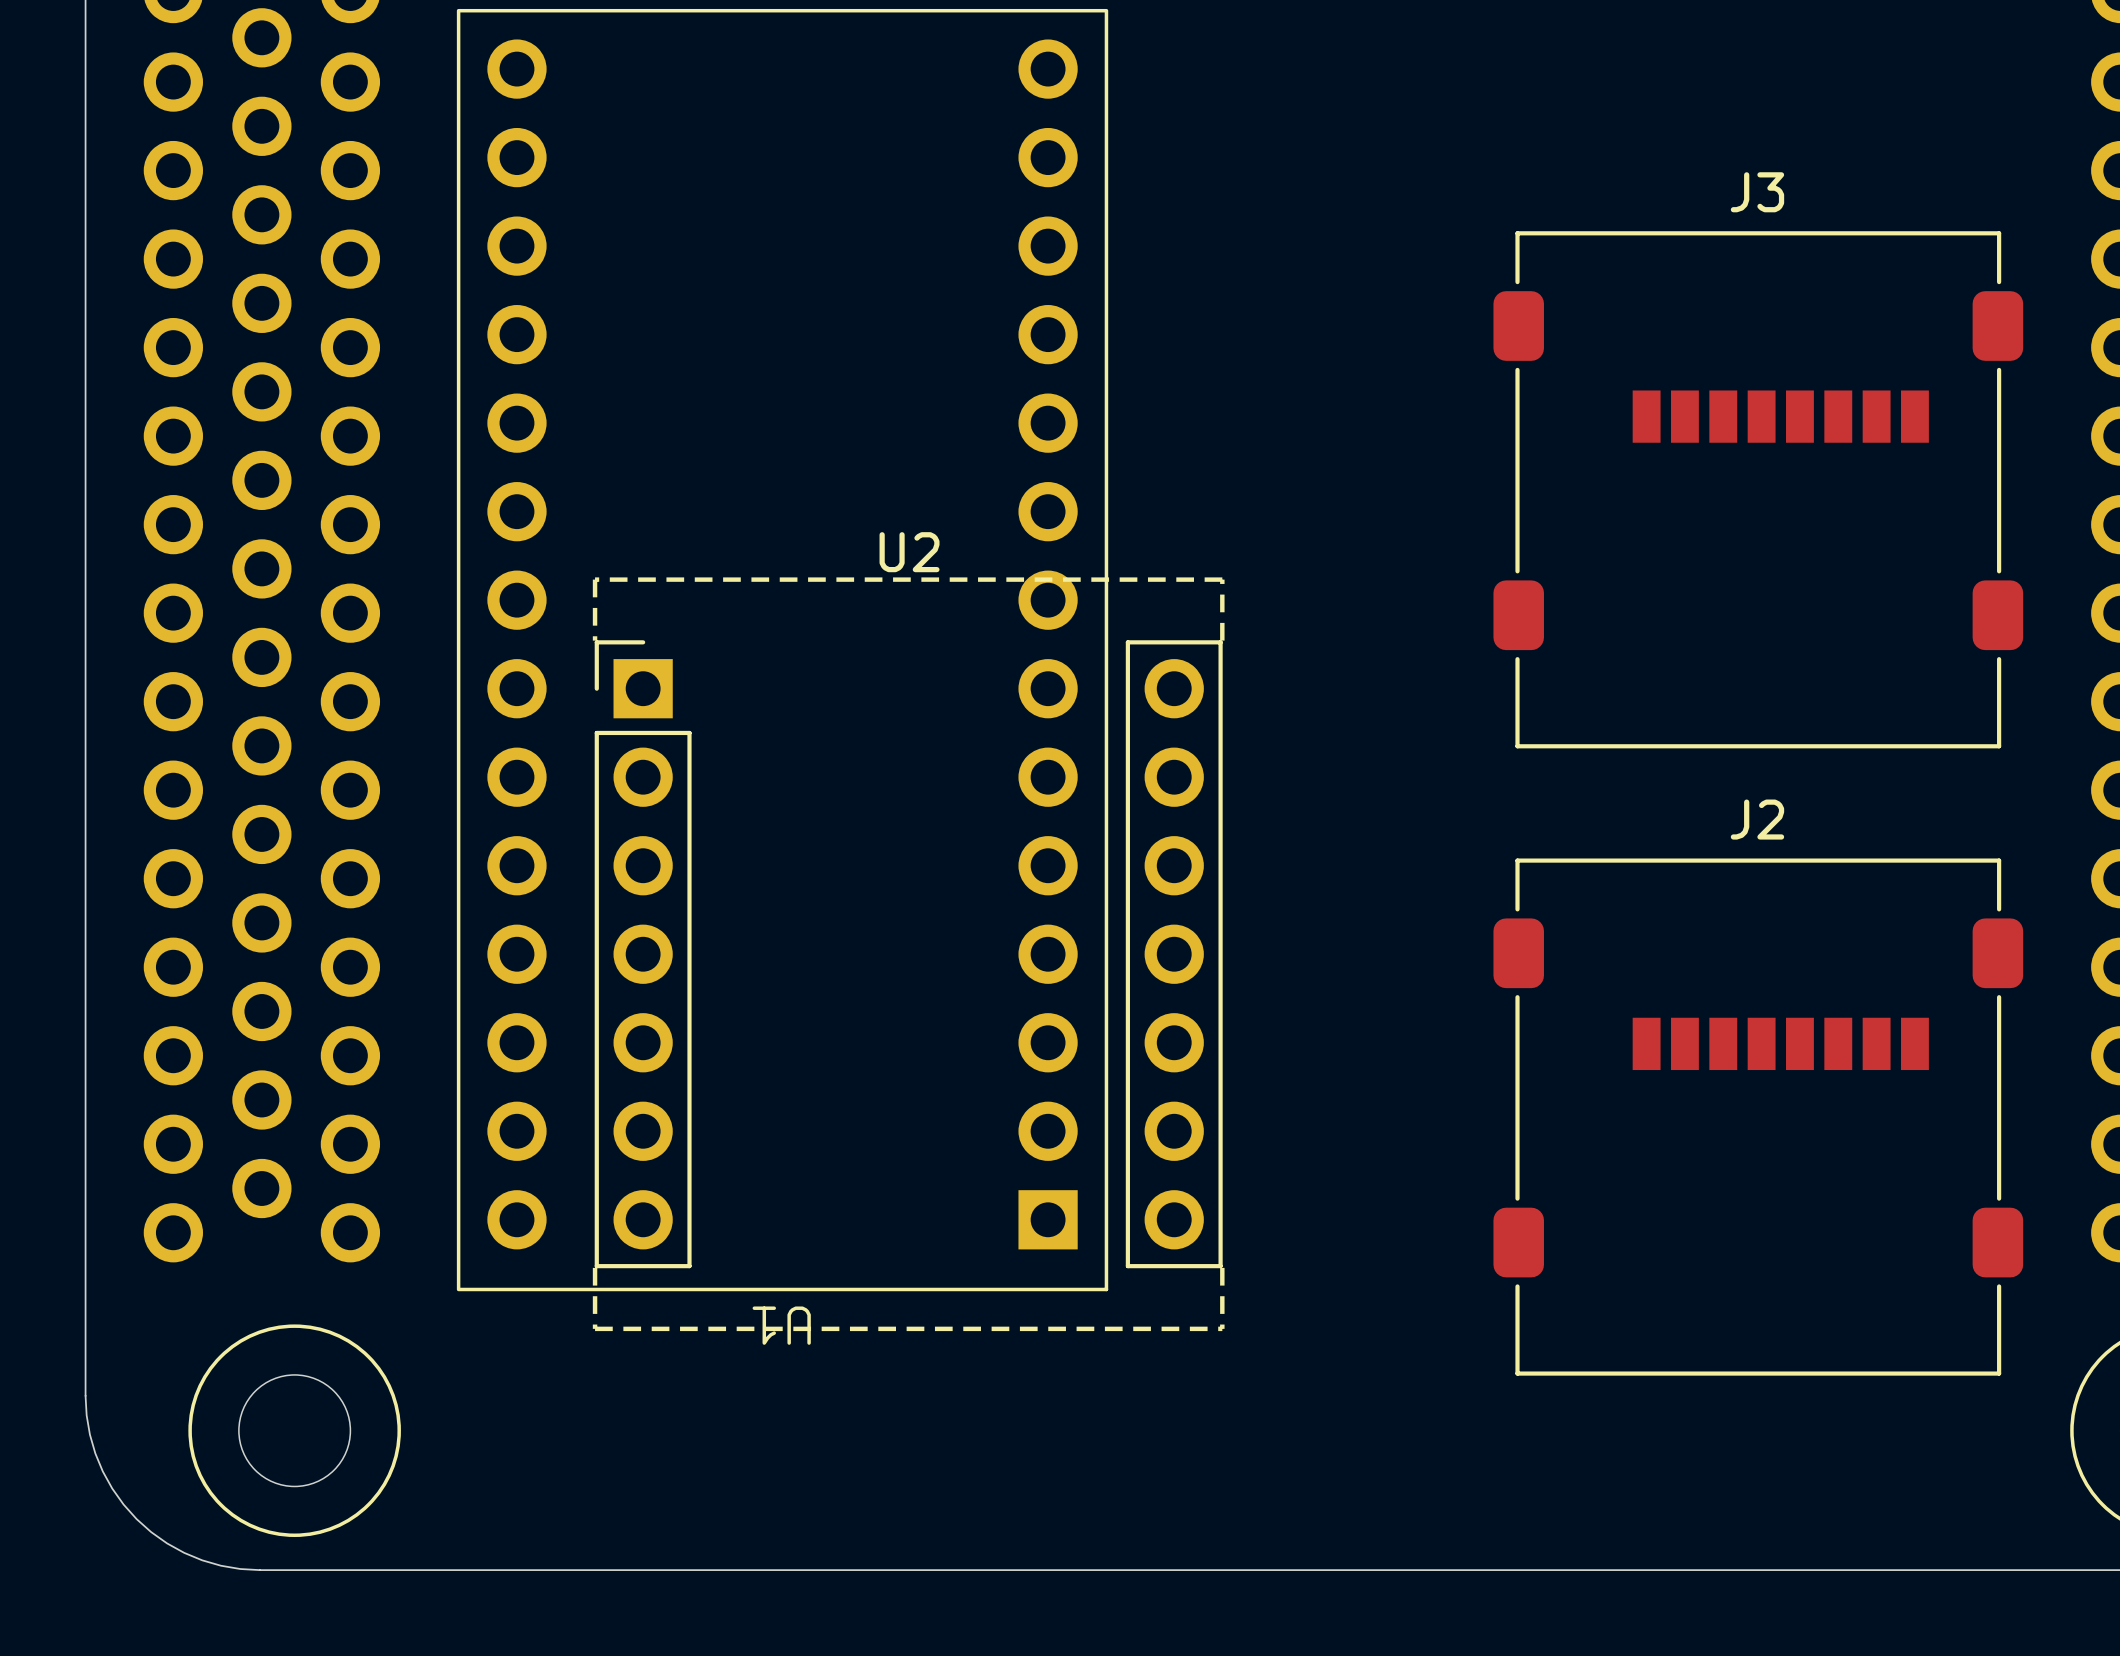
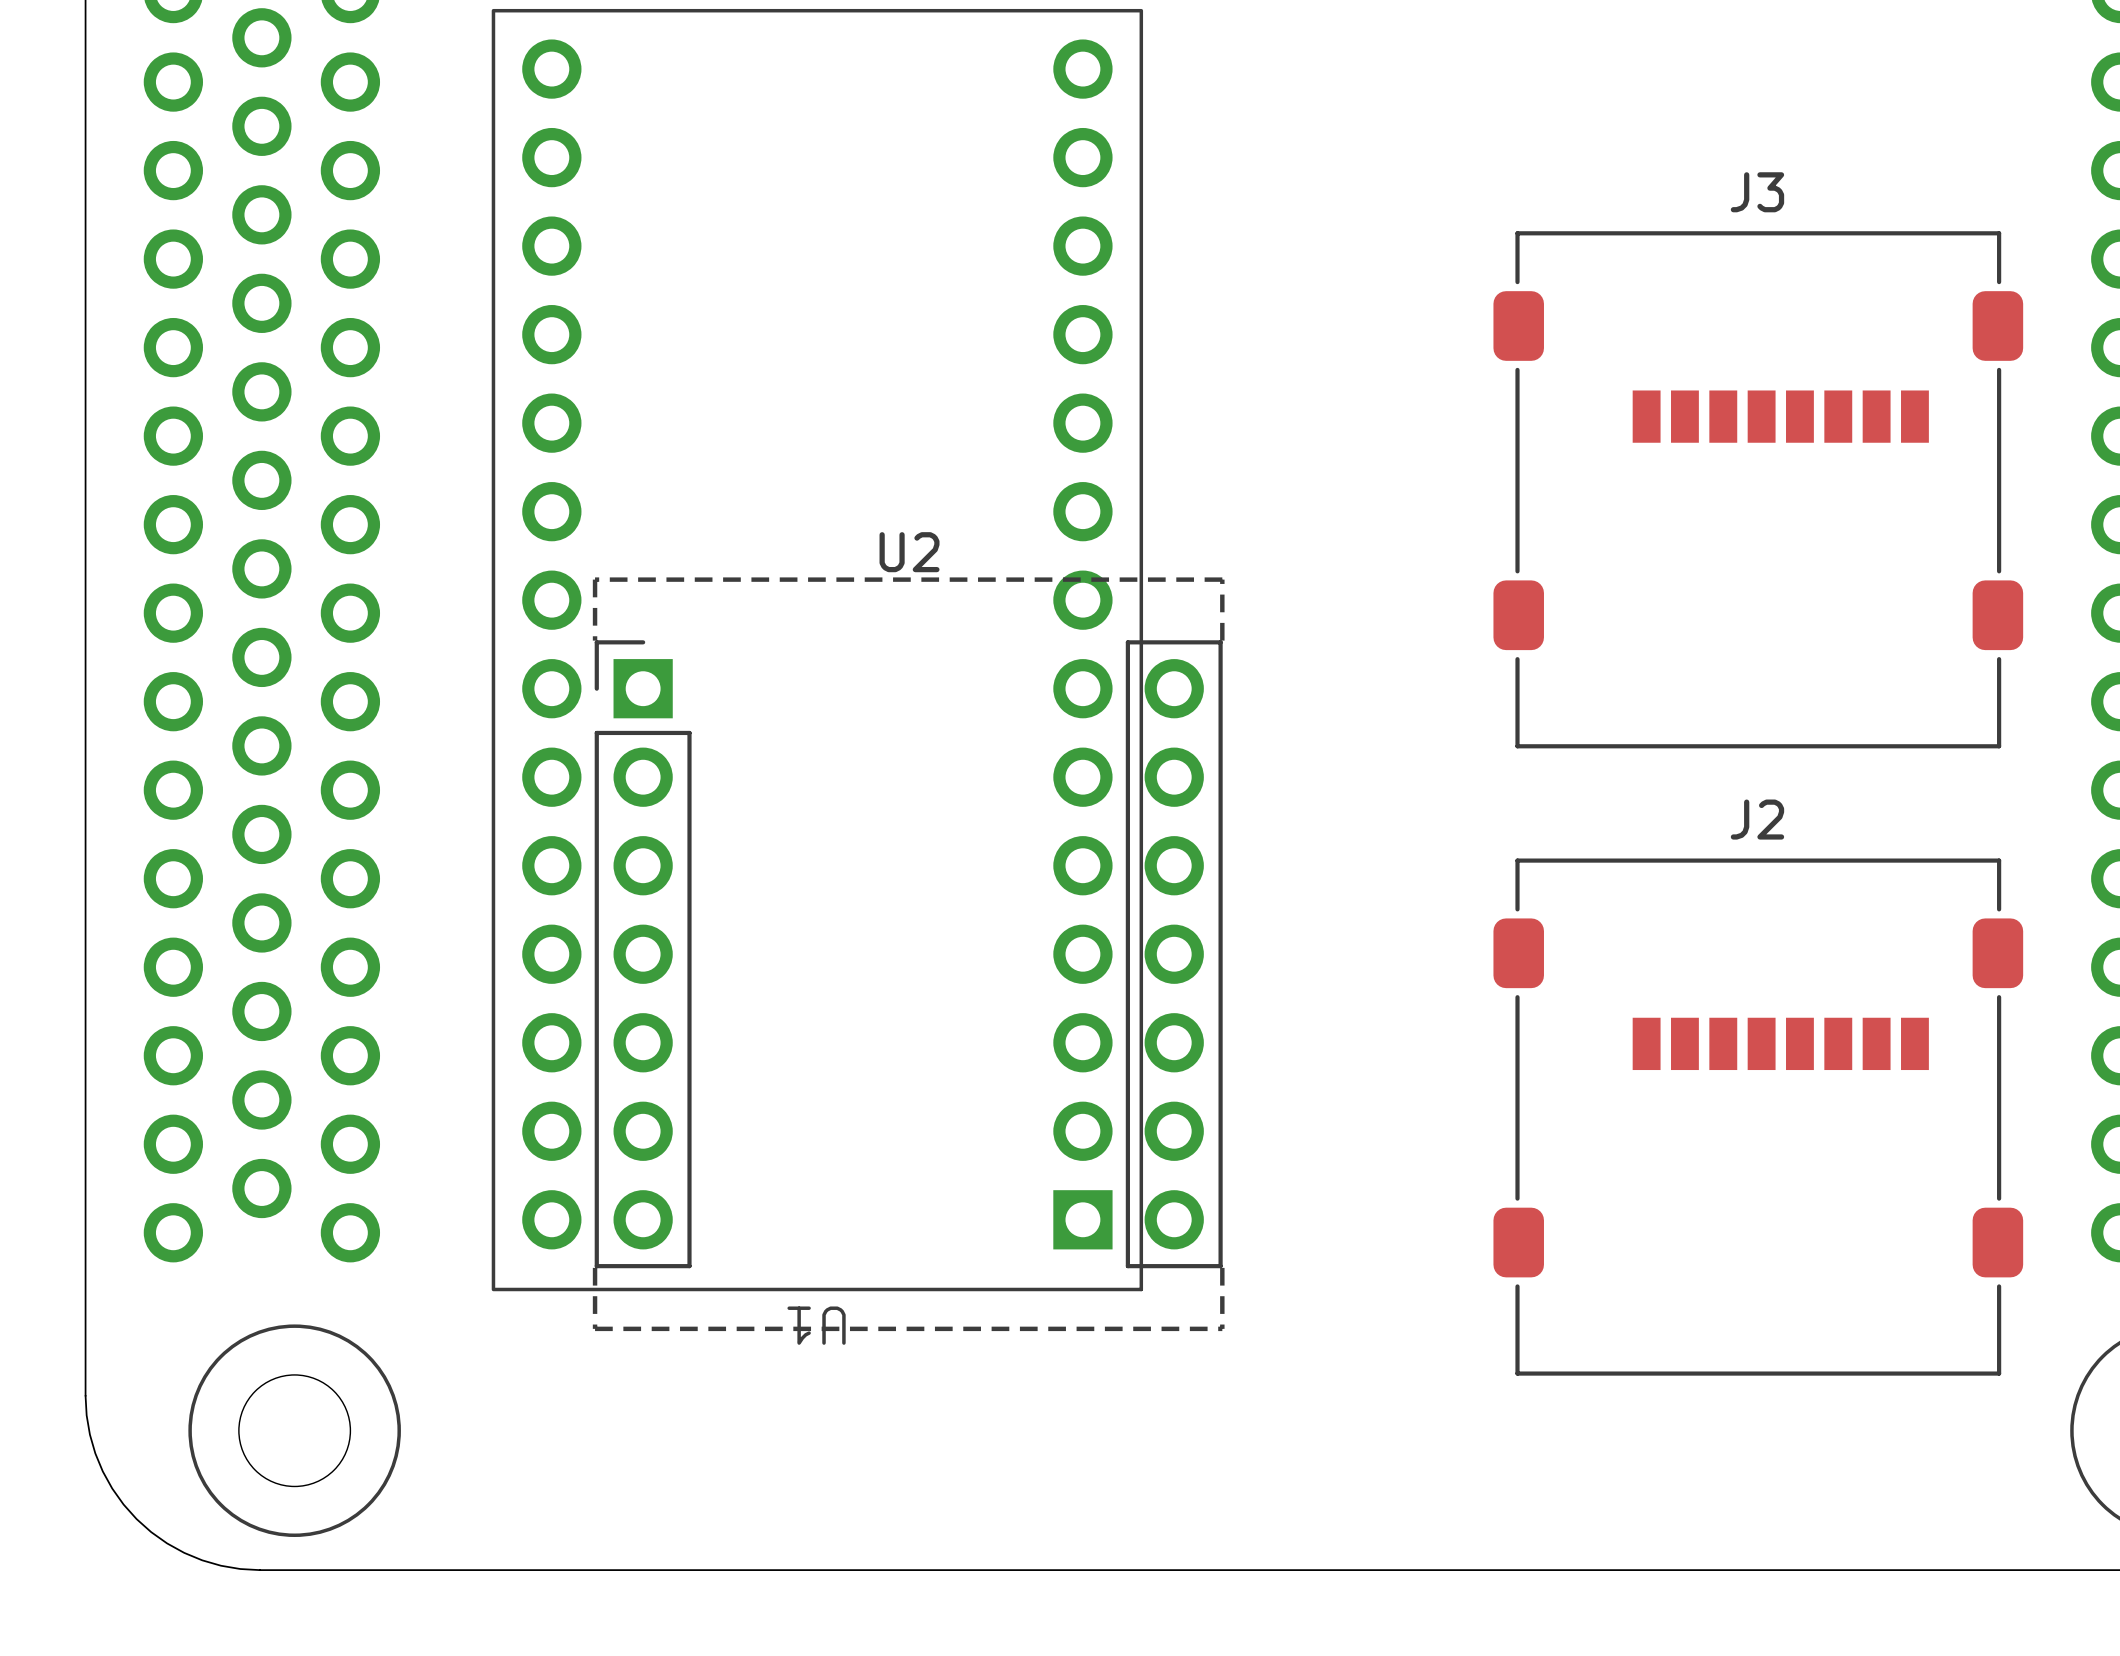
U1 position: (782, 650) -> (817, 650)

